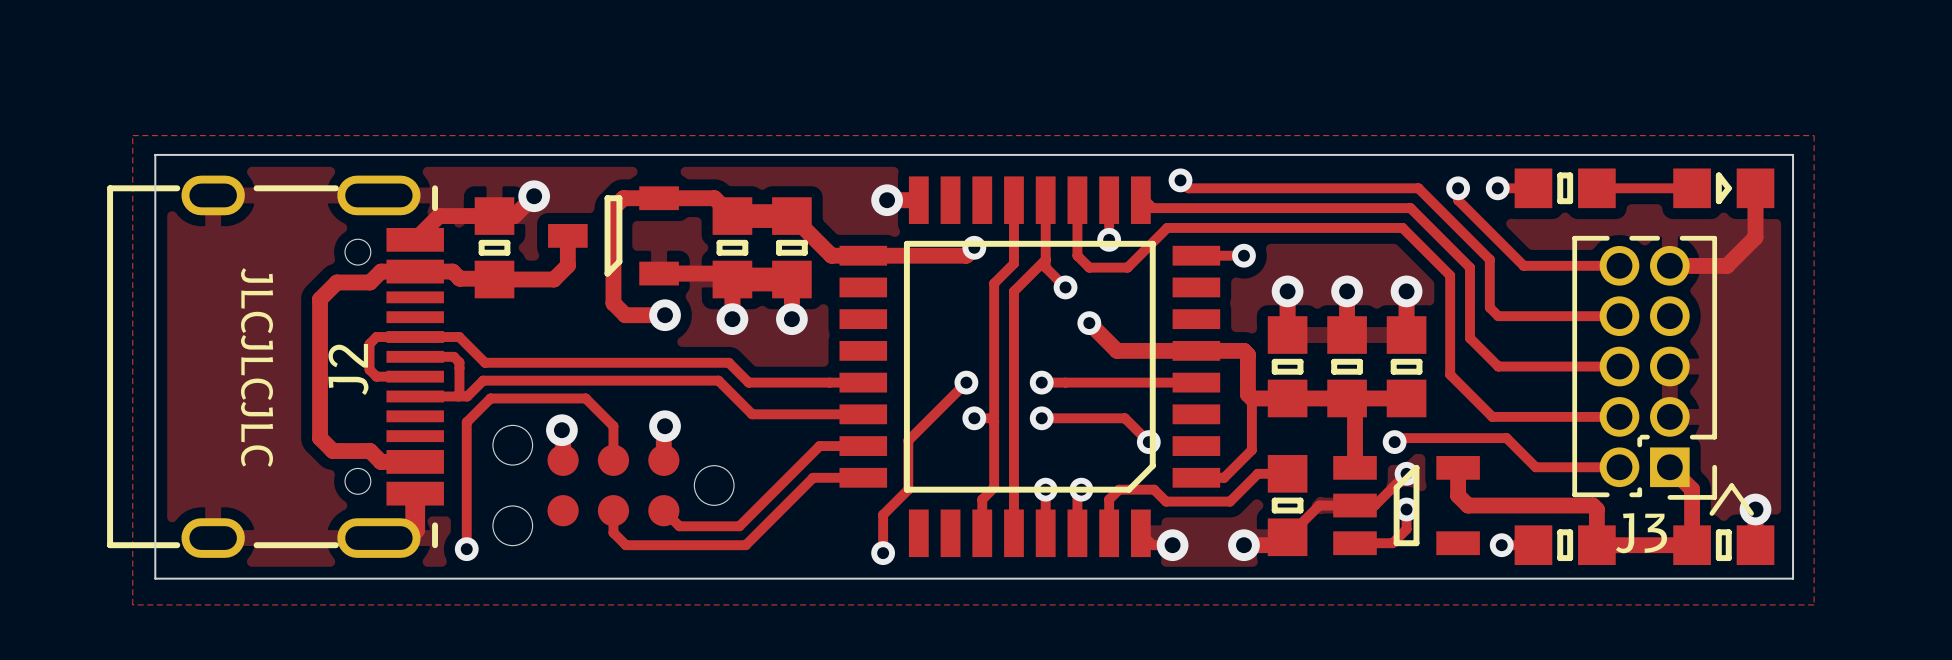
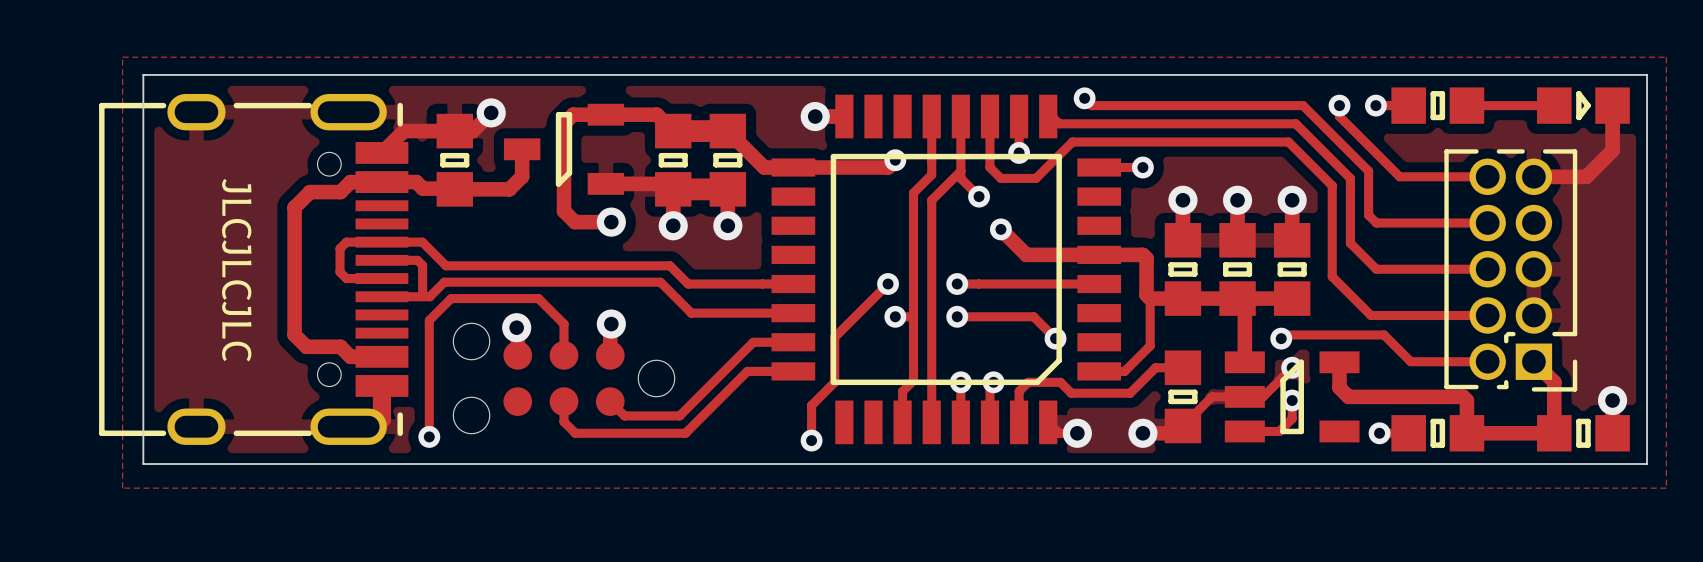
J2 name: J2 (348, 369) -> none
line: (1711, 513) (1731, 485) (1751, 513) -> none
J3 name: J3 (1641, 533) -> none

